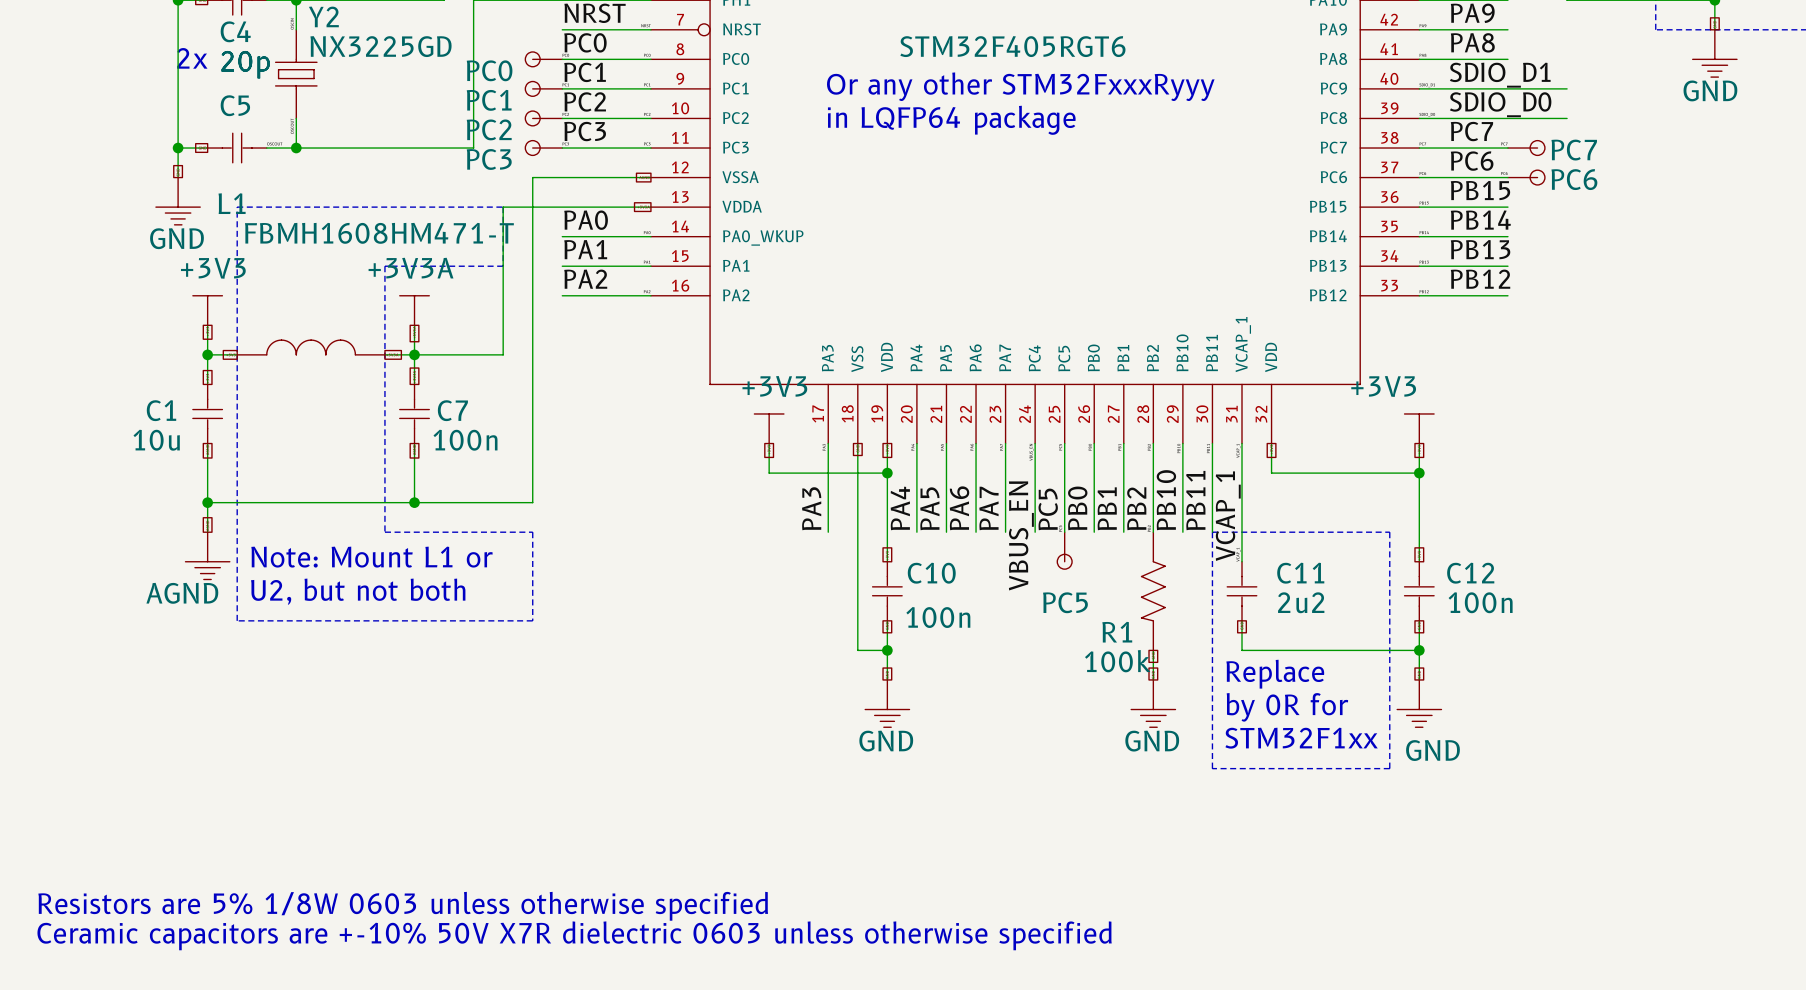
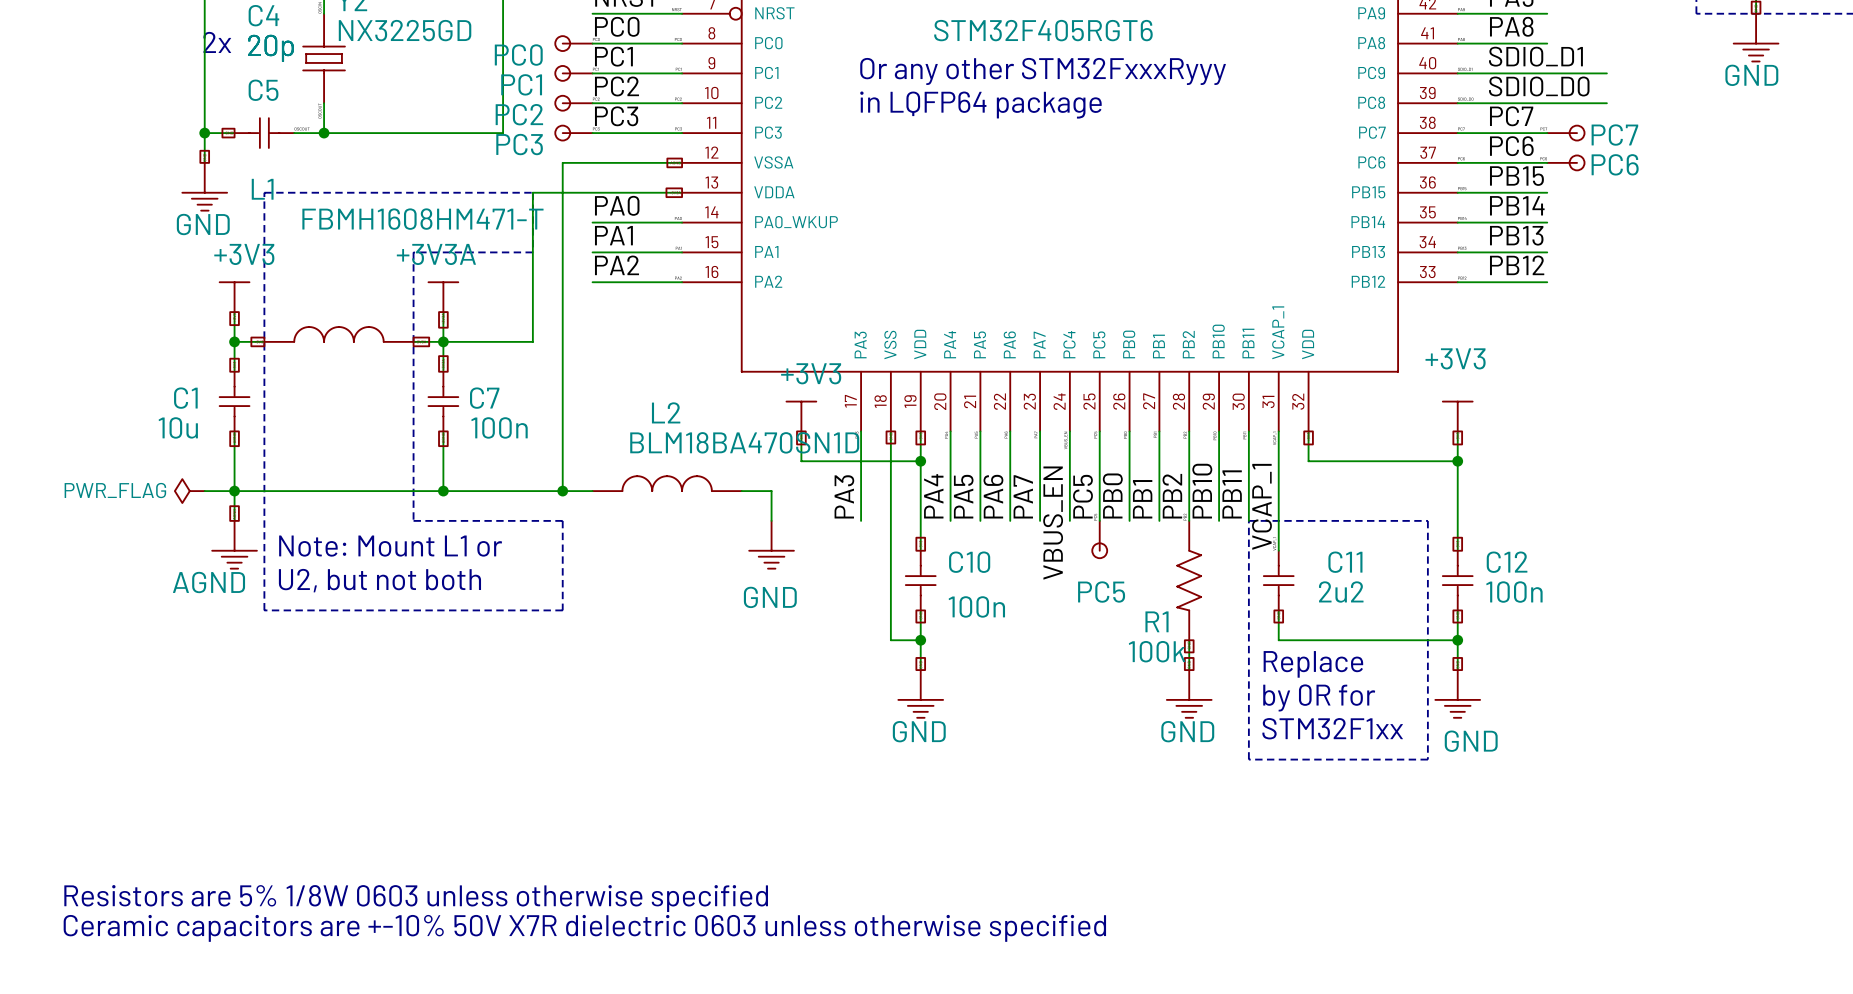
power symbol text position: +3V3 (1383, 386) -> +3V3 (1455, 358)
L2: none -> BLM18BA470SN1D (667, 483)
power symbol: none -> PWR_FLAG (189, 491)
wire: none -> (204, 491) (234, 491)
wire: none -> (562, 491) (592, 491)
junction: none -> (562, 491)
wire: none -> (741, 491) (771, 491) (771, 520)
power symbol: none -> GND (771, 544)

